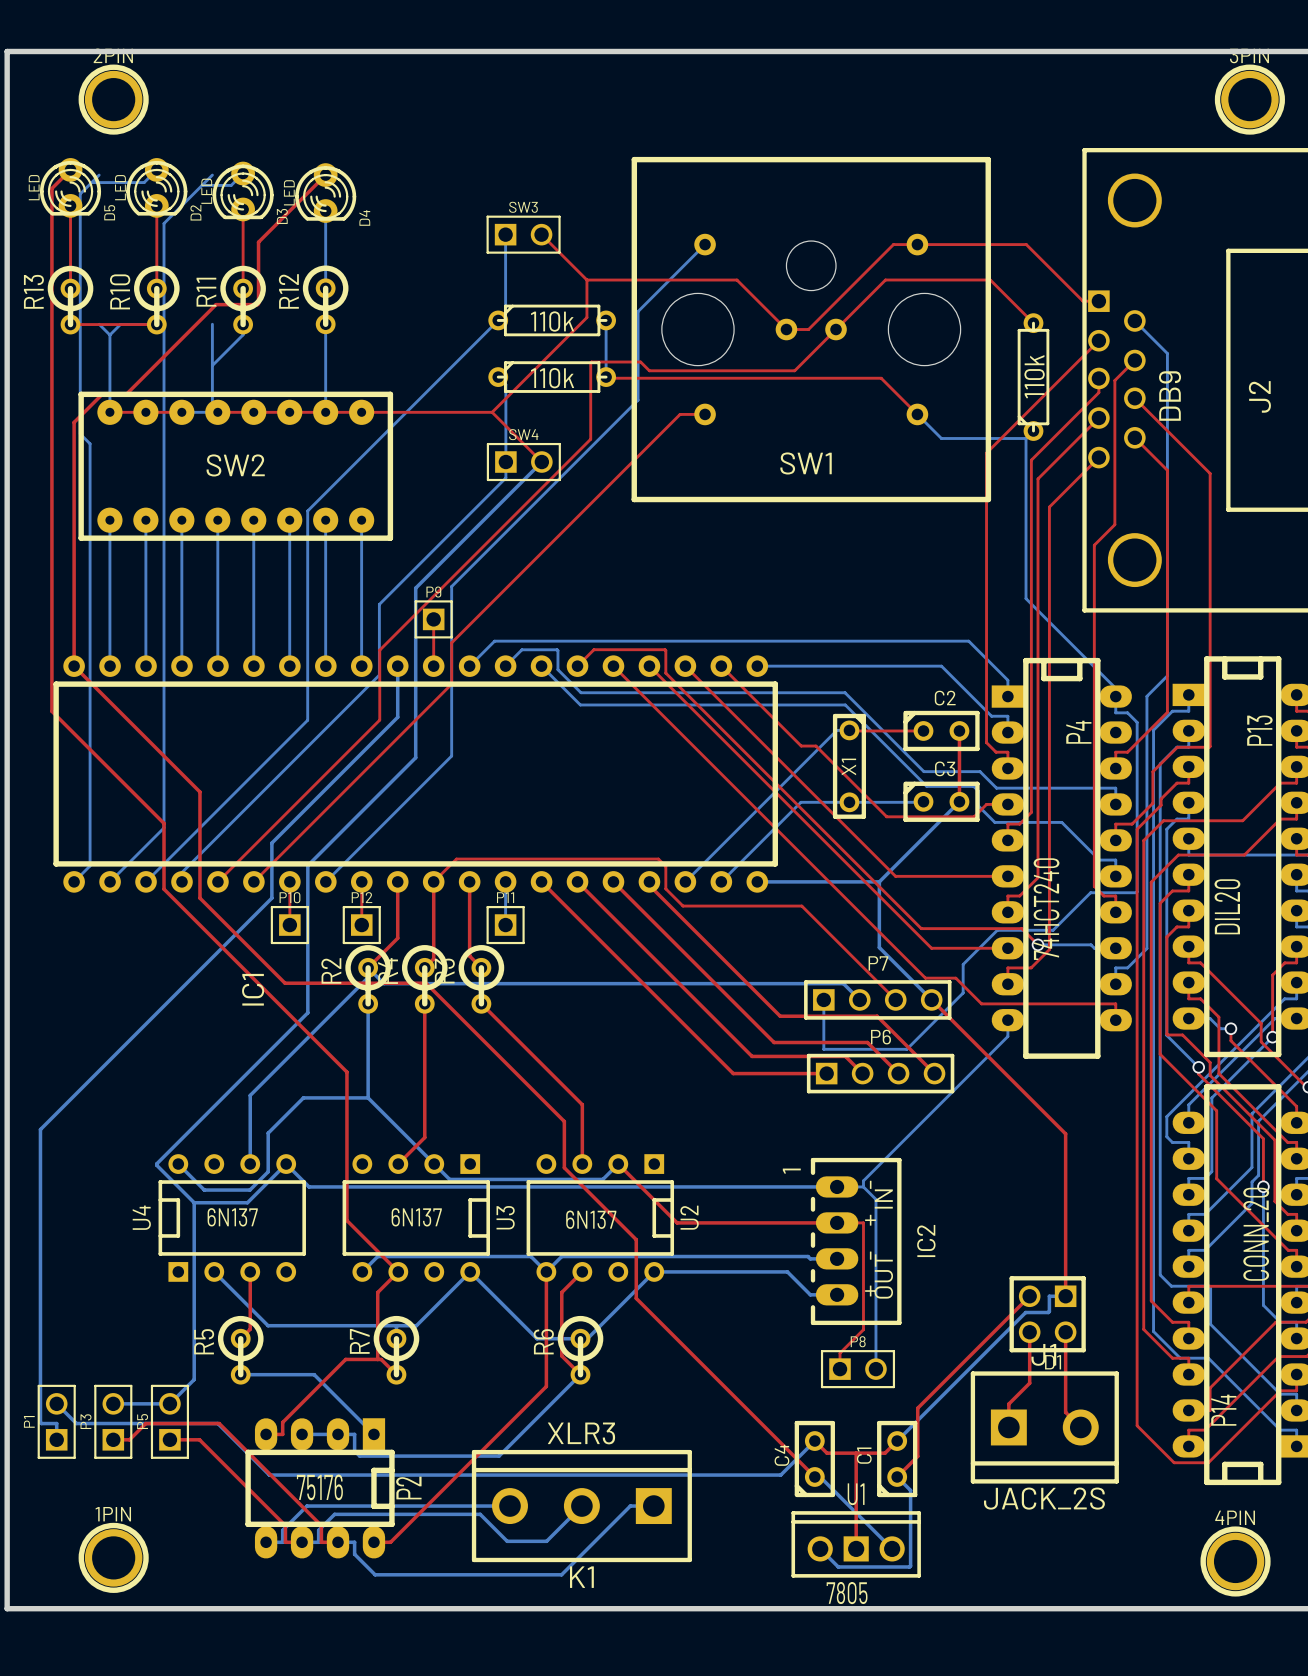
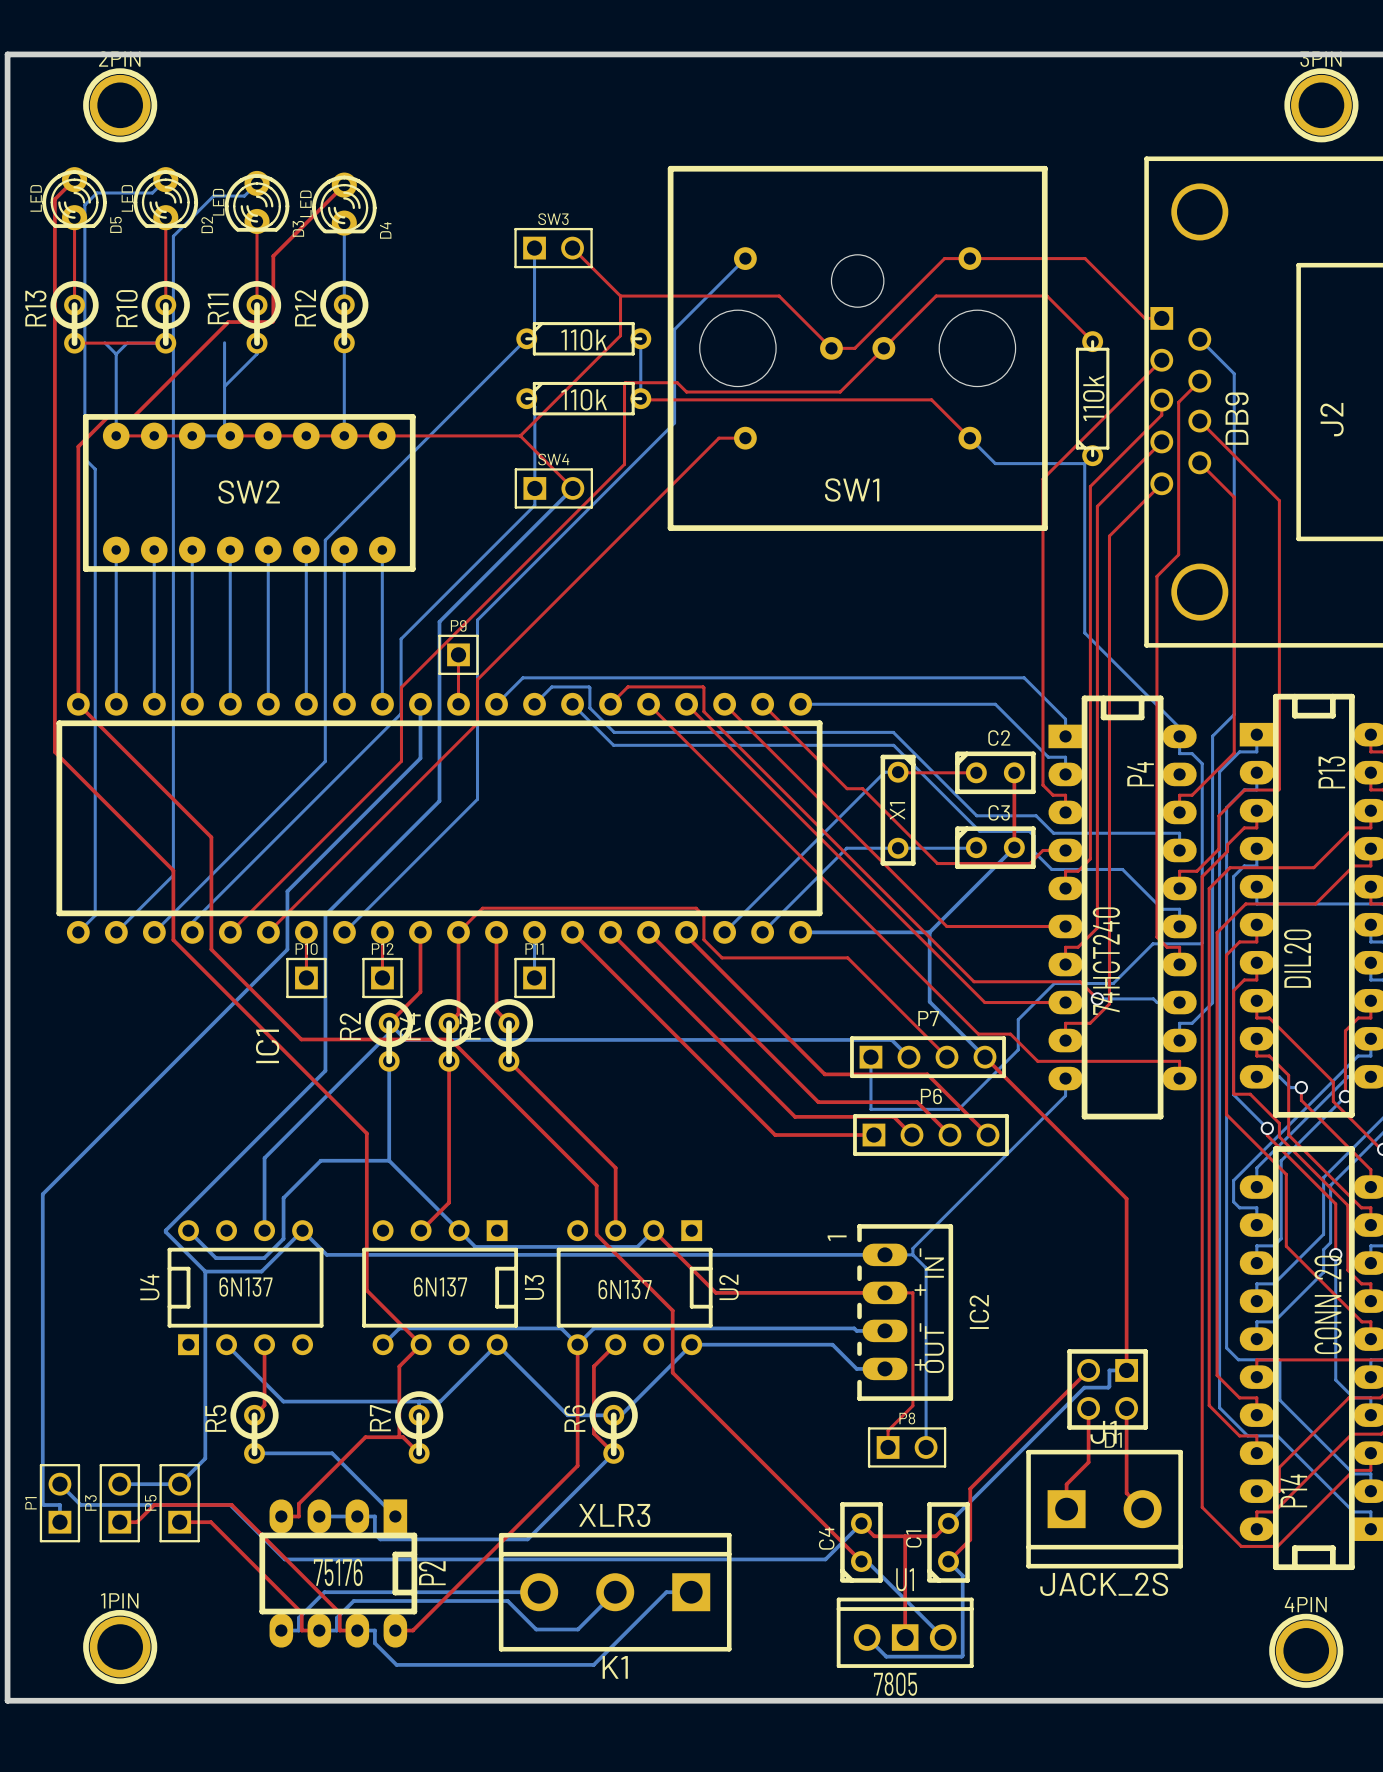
bottom track: (99, 175) (91, 182) -> none
bottom track: (212, 175) (202, 185) -> none

